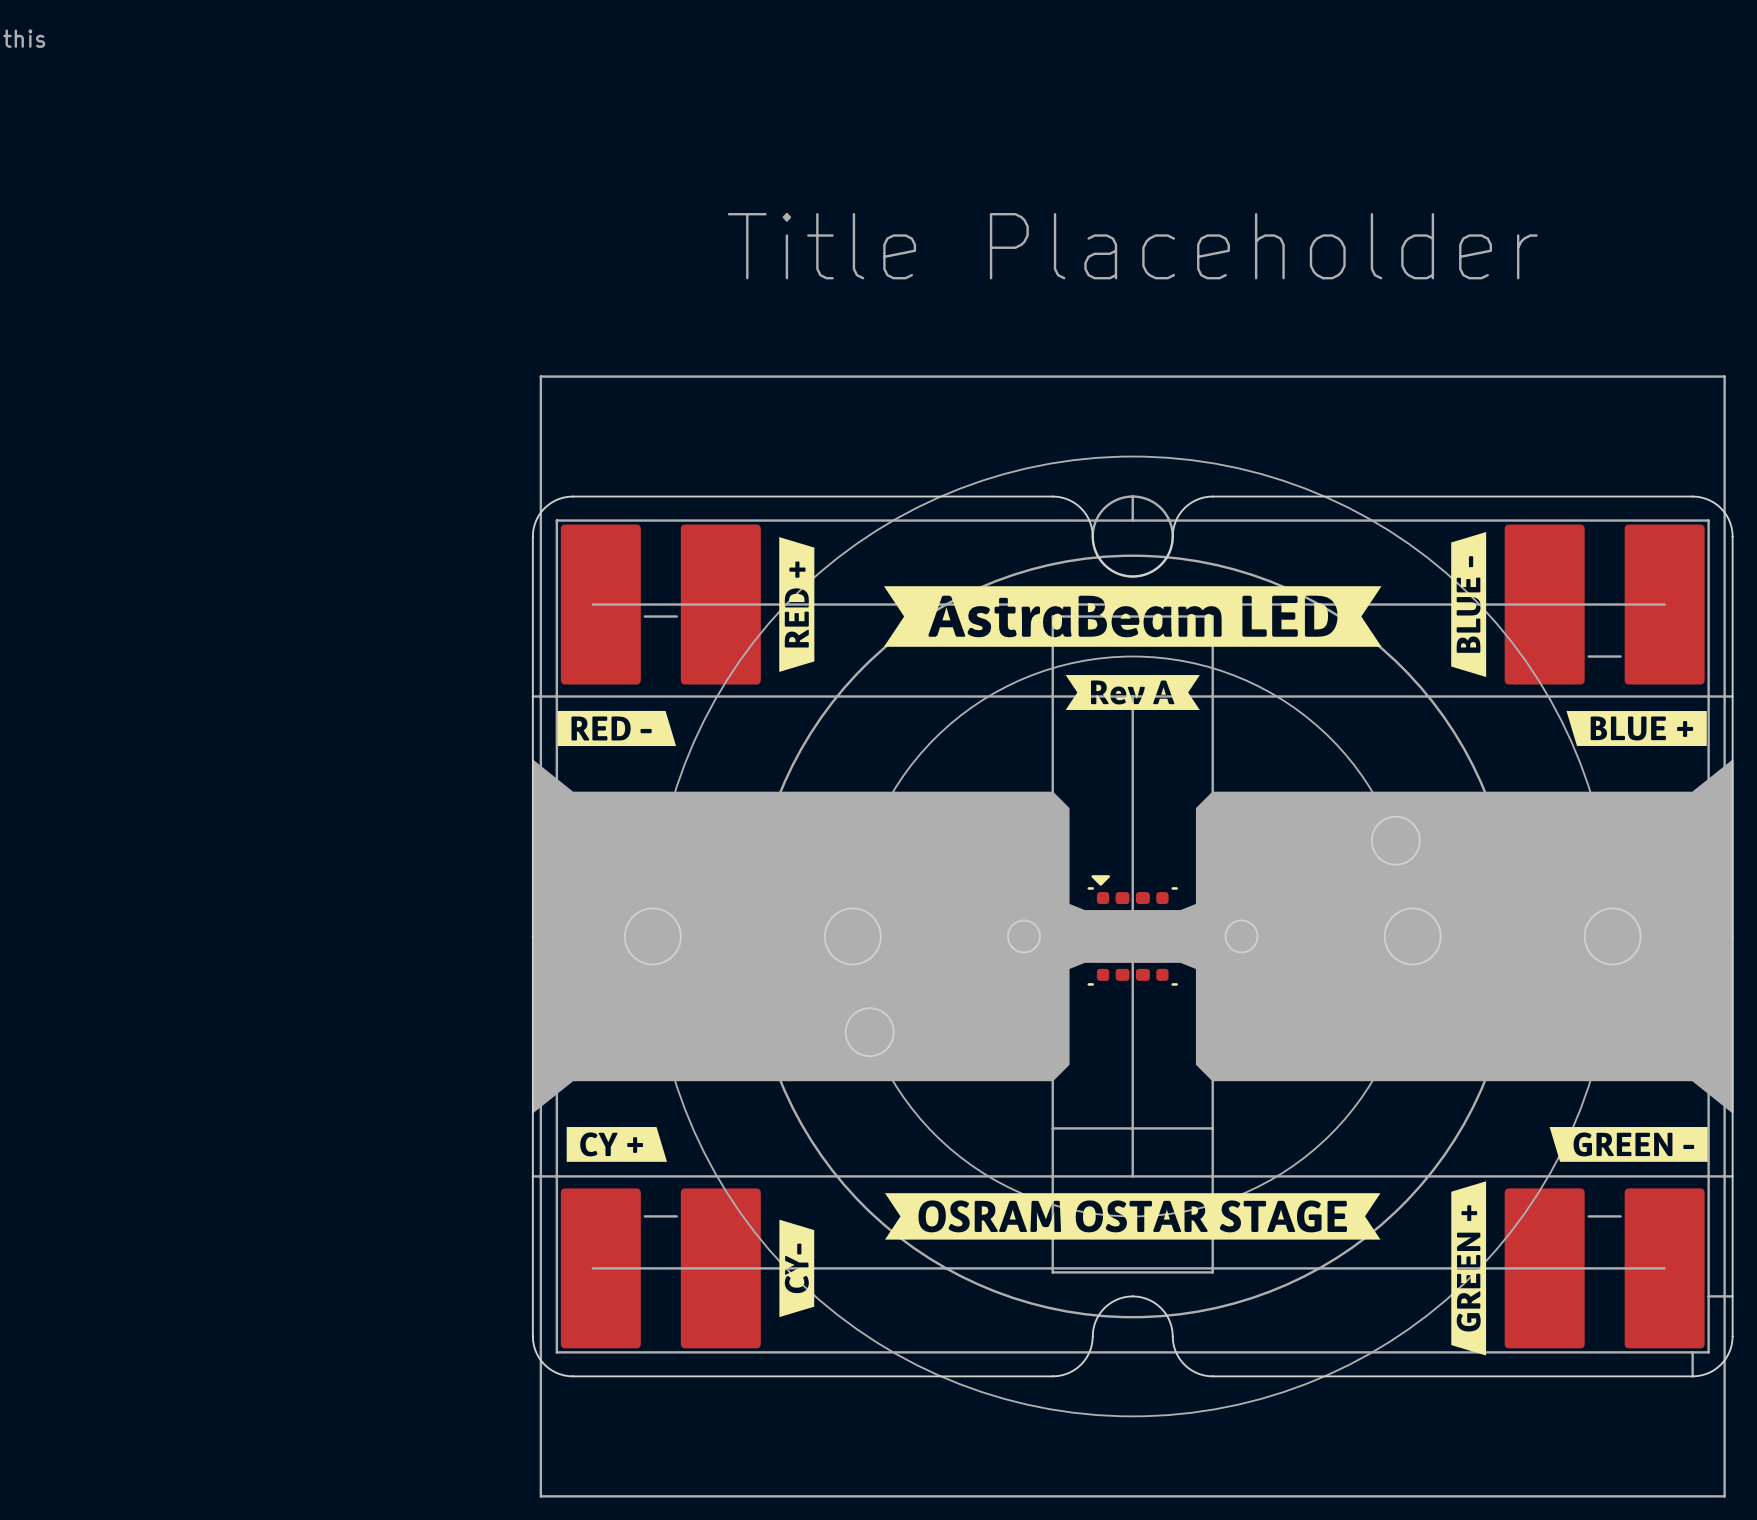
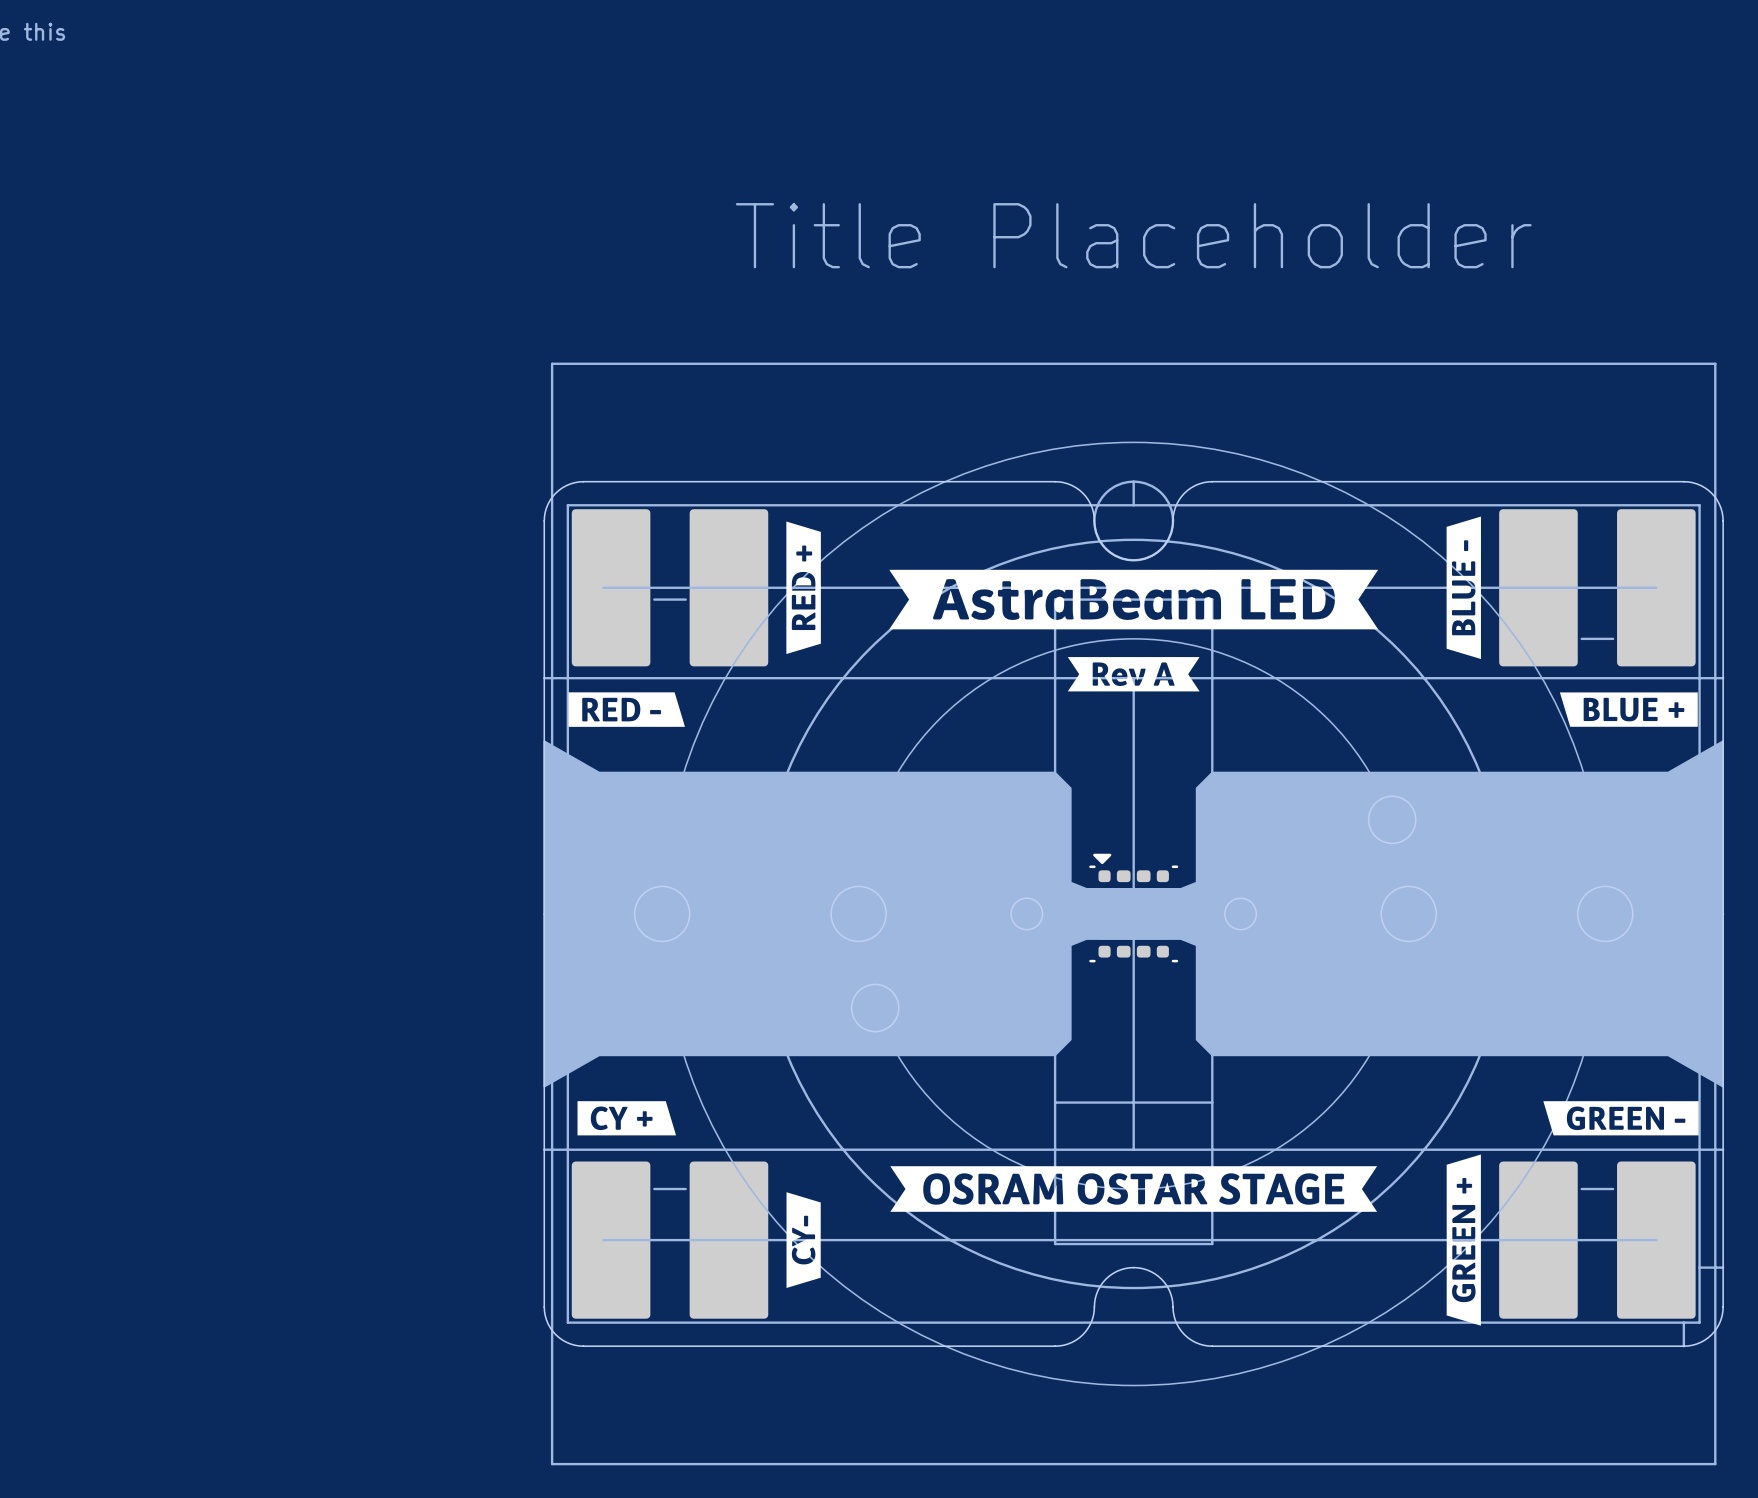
drawing shape: [532, 759, 1734, 1114] -> [543, 740, 1724, 1088]

